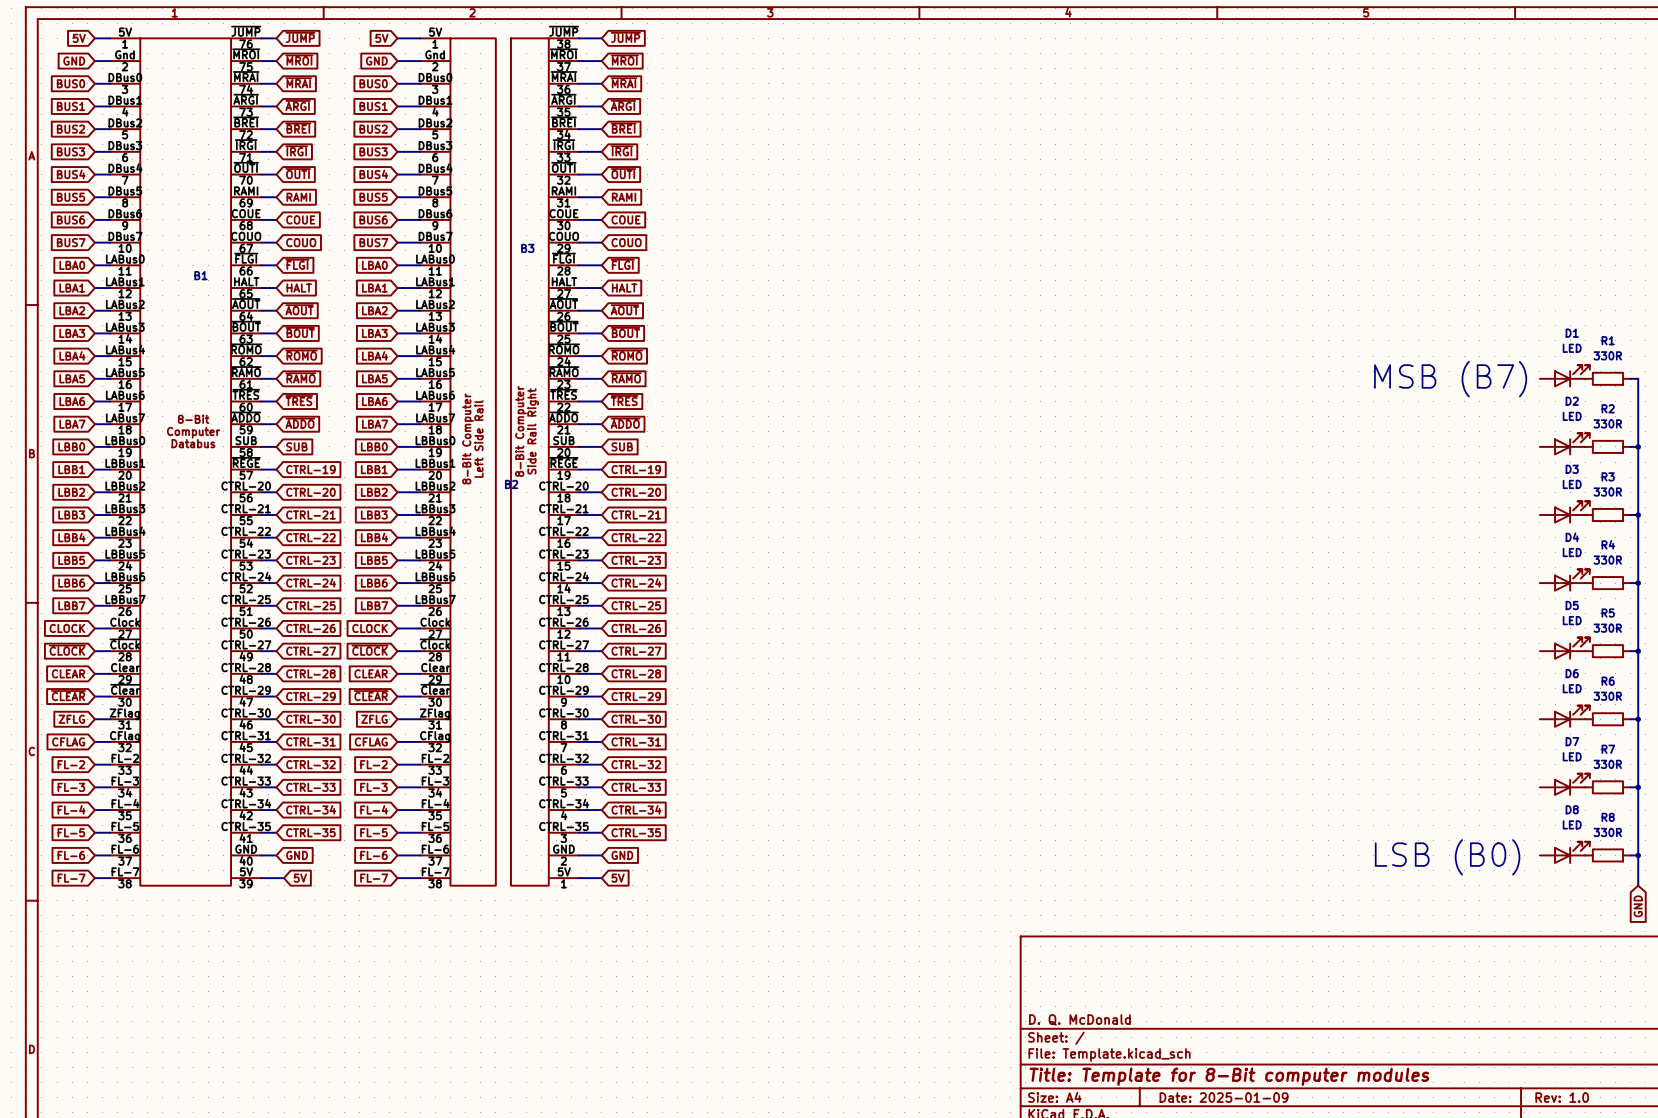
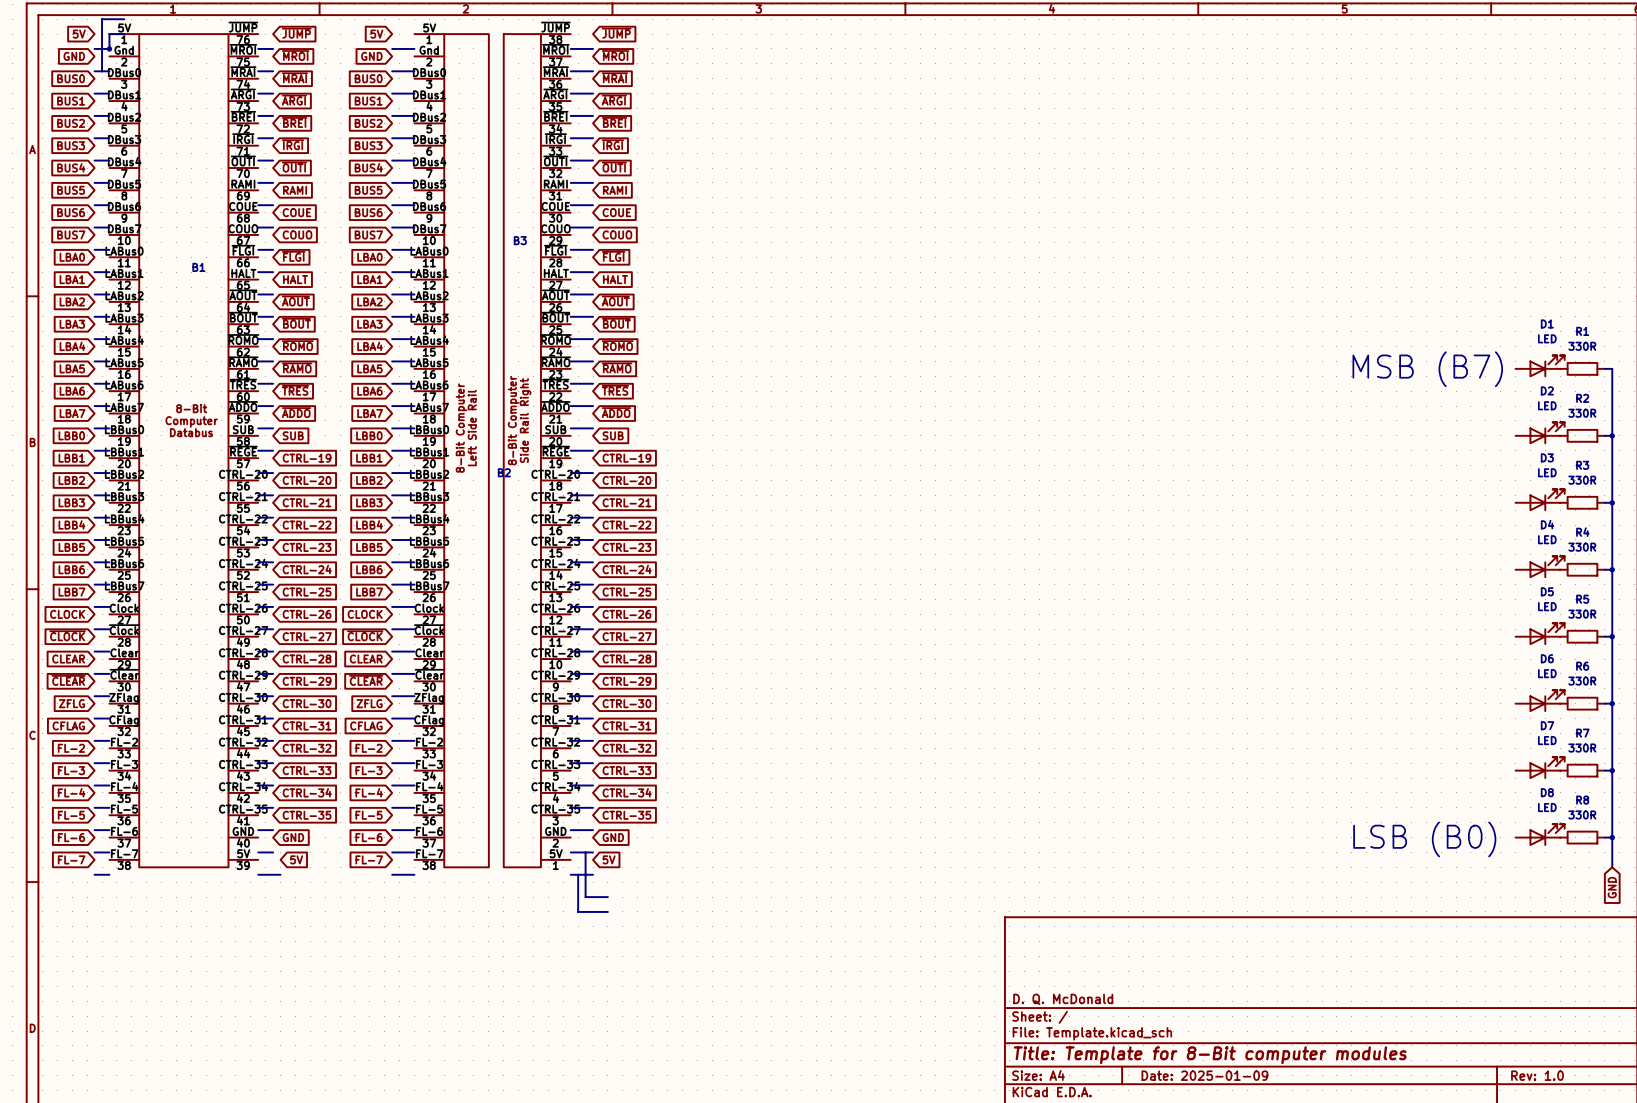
wire: none -> (124, 19) (102, 19) (102, 71)
wire: (94, 38) (110, 38) -> none
wire: none -> (124, 34) (109, 34) (109, 48) (94, 48)
wire: (261, 38) (276, 38) -> (258, 48) (273, 48)
wire: (397, 38) (420, 38) -> (392, 48) (414, 48)
wire: (579, 38) (601, 38) -> (570, 48) (593, 48)
junction: none -> (109, 48)
wire: (94, 61) (110, 61) -> (94, 71) (109, 71)
wire: (261, 61) (276, 61) -> (258, 71) (273, 71)
wire: (397, 61) (420, 61) -> (392, 71) (414, 71)
wire: (579, 61) (601, 61) -> (570, 71) (593, 71)
wire: (94, 83) (110, 83) -> (94, 93) (109, 93)
wire: (261, 83) (276, 83) -> (258, 93) (273, 93)
wire: (397, 83) (420, 83) -> (392, 93) (414, 93)
wire: (579, 83) (601, 83) -> (570, 93) (593, 93)
wire: (94, 106) (110, 106) -> (94, 115) (109, 115)
wire: (261, 106) (276, 106) -> (258, 115) (273, 115)
wire: (397, 106) (420, 106) -> (392, 115) (414, 115)
wire: (579, 106) (601, 106) -> (570, 115) (593, 115)
wire: (94, 129) (110, 129) -> (94, 138) (109, 138)
wire: (261, 129) (276, 129) -> (258, 138) (273, 138)
wire: (397, 129) (420, 129) -> (392, 138) (414, 138)
wire: (579, 129) (601, 129) -> (570, 138) (593, 138)
wire: (94, 151) (110, 151) -> (94, 160) (109, 160)
wire: (261, 151) (276, 151) -> (258, 160) (273, 160)
wire: (397, 151) (420, 151) -> (392, 160) (414, 160)
wire: (579, 151) (601, 151) -> (570, 160) (593, 160)
wire: (94, 174) (110, 174) -> (94, 182) (109, 182)
wire: (261, 174) (276, 174) -> (258, 182) (273, 182)
wire: (397, 174) (420, 174) -> (392, 182) (414, 182)
wire: (579, 174) (601, 174) -> (570, 182) (593, 182)
wire: (94, 197) (110, 197) -> (94, 205) (109, 205)
wire: (261, 197) (276, 197) -> (258, 205) (273, 205)
wire: (397, 197) (420, 197) -> (392, 205) (414, 205)
wire: (579, 197) (601, 197) -> (570, 205) (593, 205)
wire: (94, 219) (110, 219) -> (94, 227) (109, 227)
wire: (261, 219) (276, 219) -> (258, 227) (273, 227)
wire: (397, 219) (420, 219) -> (392, 227) (414, 227)
wire: (579, 219) (601, 219) -> (570, 227) (593, 227)
wire: (94, 242) (110, 242) -> (94, 249) (109, 249)
wire: (261, 242) (276, 242) -> (258, 249) (273, 249)
wire: (397, 242) (420, 242) -> (392, 249) (414, 249)
wire: (579, 242) (601, 242) -> (570, 249) (593, 249)
wire: (94, 265) (110, 265) -> (94, 272) (109, 272)
wire: (261, 265) (276, 265) -> (258, 272) (273, 272)
wire: (397, 265) (420, 265) -> (392, 272) (414, 272)
wire: (579, 265) (601, 265) -> (570, 272) (593, 272)
wire: (94, 288) (110, 288) -> (94, 294) (109, 294)
wire: (261, 288) (276, 288) -> (258, 294) (273, 294)
wire: (397, 288) (420, 288) -> (392, 294) (414, 294)
wire: (579, 288) (601, 288) -> (570, 294) (593, 294)
wire: (94, 310) (110, 310) -> (94, 316) (109, 316)
wire: (261, 310) (276, 310) -> (258, 316) (273, 316)
wire: (397, 310) (420, 310) -> (392, 316) (414, 316)
wire: (579, 310) (601, 310) -> (570, 316) (593, 316)
wire: (94, 333) (110, 333) -> (94, 339) (109, 339)
wire: (261, 333) (276, 333) -> (258, 339) (273, 339)
wire: (397, 333) (420, 333) -> (392, 339) (414, 339)
wire: (579, 333) (601, 333) -> (570, 339) (593, 339)
wire: (94, 356) (110, 356) -> (94, 361) (109, 361)
wire: (261, 356) (276, 356) -> (258, 361) (273, 361)
wire: (397, 356) (420, 356) -> (392, 361) (414, 361)
wire: (579, 356) (601, 356) -> (570, 361) (593, 361)
wire: (94, 378) (110, 378) -> (94, 383) (109, 383)
wire: (261, 378) (276, 378) -> (258, 383) (273, 383)
wire: (397, 378) (420, 378) -> (392, 383) (414, 383)
wire: (579, 378) (601, 378) -> (570, 383) (593, 383)
wire: (94, 401) (110, 401) -> (94, 406) (109, 406)
wire: (261, 401) (276, 401) -> (258, 406) (273, 406)
wire: (397, 401) (420, 401) -> (392, 406) (414, 406)
wire: (579, 401) (601, 401) -> (570, 406) (593, 406)
wire: (94, 424) (110, 424) -> (94, 428) (109, 428)
wire: (261, 424) (276, 424) -> (258, 428) (273, 428)
wire: (397, 424) (420, 424) -> (392, 428) (414, 428)
wire: (579, 424) (601, 424) -> (570, 428) (593, 428)
wire: (94, 446) (110, 446) -> (94, 450) (109, 450)
wire: (261, 446) (276, 446) -> (258, 450) (273, 450)
wire: (397, 446) (420, 446) -> (392, 450) (414, 450)
wire: (579, 446) (601, 446) -> (570, 450) (593, 450)
wire: (94, 469) (110, 469) -> (94, 473) (109, 473)
wire: (261, 469) (276, 469) -> (258, 473) (273, 473)
wire: (397, 469) (420, 469) -> (392, 473) (414, 473)
wire: (579, 469) (601, 469) -> (570, 473) (593, 473)
wire: (94, 492) (110, 492) -> (94, 495) (109, 495)
wire: (261, 492) (276, 492) -> (258, 495) (273, 495)
wire: (397, 492) (420, 492) -> (392, 495) (414, 495)
wire: (579, 492) (601, 492) -> (570, 495) (593, 495)
wire: (94, 514) (110, 514) -> (94, 517) (109, 517)
wire: (261, 514) (276, 514) -> (258, 517) (273, 517)
wire: (397, 514) (420, 514) -> (392, 517) (414, 517)
wire: (579, 514) (601, 514) -> (570, 517) (593, 517)
wire: (94, 537) (110, 537) -> (94, 539) (109, 539)
wire: (261, 537) (276, 537) -> (258, 539) (273, 539)
wire: (397, 537) (420, 537) -> (392, 539) (414, 539)
wire: (579, 537) (601, 537) -> (570, 539) (593, 539)
wire: (94, 560) (110, 560) -> (94, 562) (109, 562)
wire: (261, 560) (276, 560) -> (258, 562) (273, 562)
wire: (397, 560) (420, 560) -> (392, 562) (414, 562)
wire: (579, 560) (601, 560) -> (570, 562) (593, 562)
wire: (94, 583) (110, 583) -> (94, 584) (109, 584)
wire: (261, 583) (276, 583) -> (258, 584) (273, 584)
wire: (397, 583) (420, 583) -> (392, 584) (414, 584)
wire: (579, 583) (601, 583) -> (570, 584) (593, 584)
wire: (94, 605) (110, 605) -> (94, 606) (109, 606)
wire: (261, 605) (276, 605) -> (258, 606) (273, 606)
wire: (397, 605) (420, 605) -> (392, 606) (414, 606)
wire: (579, 605) (601, 605) -> (570, 606) (593, 606)
wire: (94, 628) (110, 628) -> (94, 629) (109, 629)
wire: (261, 628) (276, 628) -> (258, 629) (273, 629)
wire: (397, 628) (420, 628) -> (392, 629) (414, 629)
wire: (579, 628) (601, 628) -> (570, 629) (593, 629)
wire: (94, 651) (110, 651) -> (94, 651) (109, 651)
wire: (261, 651) (276, 651) -> (258, 651) (273, 651)
wire: (397, 651) (420, 651) -> (392, 651) (414, 651)
wire: (579, 651) (601, 651) -> (570, 651) (593, 651)
wire: (94, 673) (110, 673) -> (94, 673) (109, 673)
wire: (261, 673) (276, 673) -> (258, 673) (273, 673)
wire: (397, 673) (420, 673) -> (392, 673) (414, 673)
wire: (579, 673) (601, 673) -> (570, 673) (593, 673)
wire: (94, 696) (110, 696) -> (94, 696) (109, 696)
wire: (261, 696) (276, 696) -> (258, 696) (273, 696)
wire: (397, 696) (420, 696) -> (392, 696) (414, 696)
wire: (579, 696) (601, 696) -> (570, 696) (593, 696)
wire: (94, 719) (110, 719) -> (94, 718) (109, 718)
wire: (261, 719) (276, 719) -> (258, 718) (273, 718)
wire: (397, 719) (420, 719) -> (392, 718) (414, 718)
wire: (579, 719) (601, 719) -> (570, 718) (593, 718)
wire: (94, 741) (110, 741) -> (94, 740) (109, 740)
wire: (261, 741) (276, 741) -> (258, 740) (273, 740)
wire: (397, 741) (420, 741) -> (392, 740) (414, 740)
wire: (579, 741) (601, 741) -> (570, 740) (593, 740)
wire: (94, 764) (110, 764) -> (94, 763) (109, 763)
wire: (261, 764) (276, 764) -> (258, 763) (273, 763)
wire: (397, 764) (420, 764) -> (392, 763) (414, 763)
wire: (579, 764) (601, 764) -> (570, 763) (593, 763)
wire: (94, 787) (110, 787) -> (94, 785) (109, 785)
wire: (261, 787) (276, 787) -> (258, 785) (273, 785)
wire: (397, 787) (420, 787) -> (392, 785) (414, 785)
wire: (579, 787) (601, 787) -> (570, 785) (593, 785)
wire: (94, 810) (110, 810) -> (94, 807) (109, 807)
wire: (261, 810) (276, 810) -> (258, 807) (273, 807)
wire: (397, 810) (420, 810) -> (392, 807) (414, 807)
wire: (579, 810) (601, 810) -> (570, 807) (593, 807)
wire: (94, 832) (110, 832) -> (94, 830) (109, 830)
wire: (261, 832) (276, 832) -> (258, 830) (273, 830)
wire: (397, 832) (420, 832) -> (392, 830) (414, 830)
wire: (579, 832) (601, 832) -> (570, 830) (593, 830)
wire: (94, 855) (110, 855) -> (94, 852) (109, 852)
wire: (261, 855) (276, 855) -> (258, 852) (273, 852)
wire: (397, 855) (420, 855) -> (392, 852) (414, 852)
wire: (579, 855) (601, 855) -> (570, 852) (593, 852)
wire: none -> (585, 852) (585, 897) (607, 897)
wire: (94, 878) (110, 878) -> (94, 874) (109, 874)
wire: (261, 878) (284, 878) -> (258, 874) (280, 874)
wire: (397, 878) (420, 878) -> (392, 874) (414, 874)
wire: (579, 878) (601, 878) -> (570, 874) (593, 874)
wire: none -> (578, 874) (578, 911) (607, 911)

